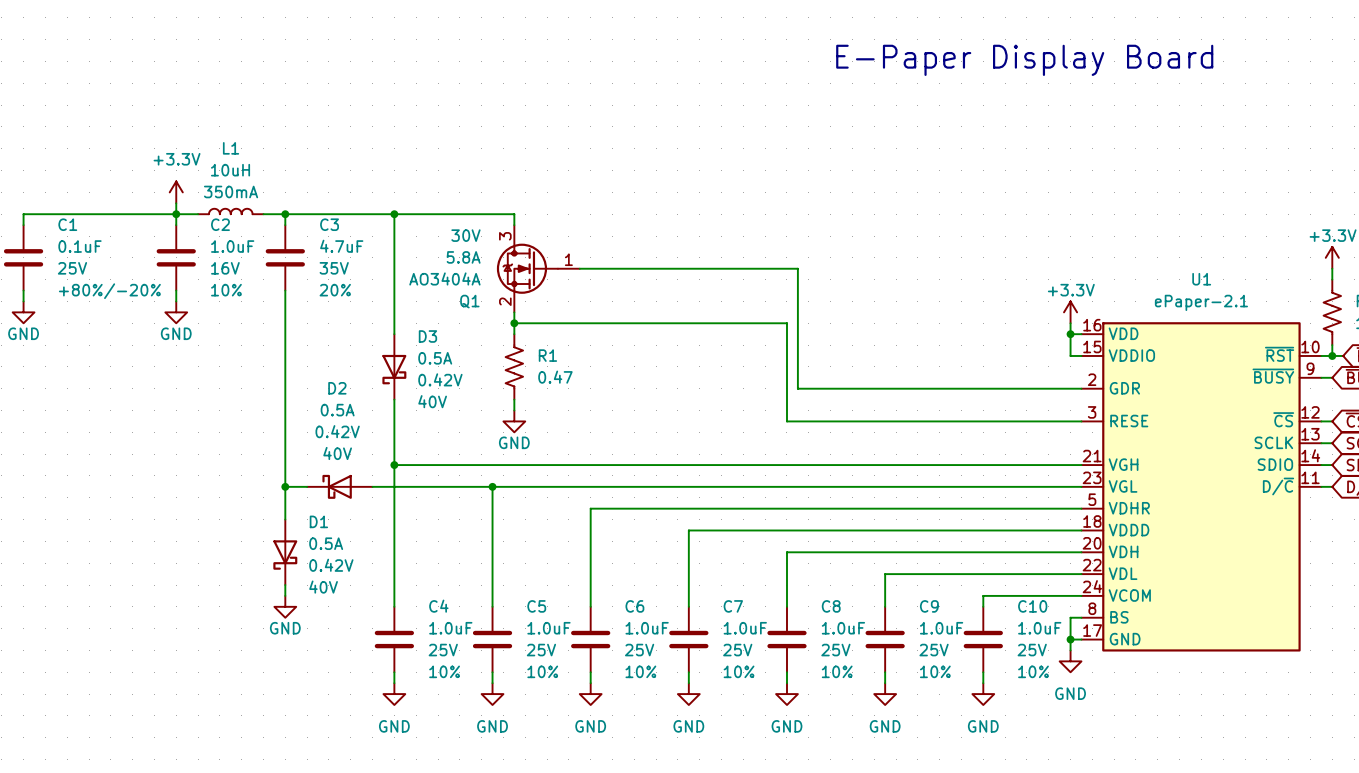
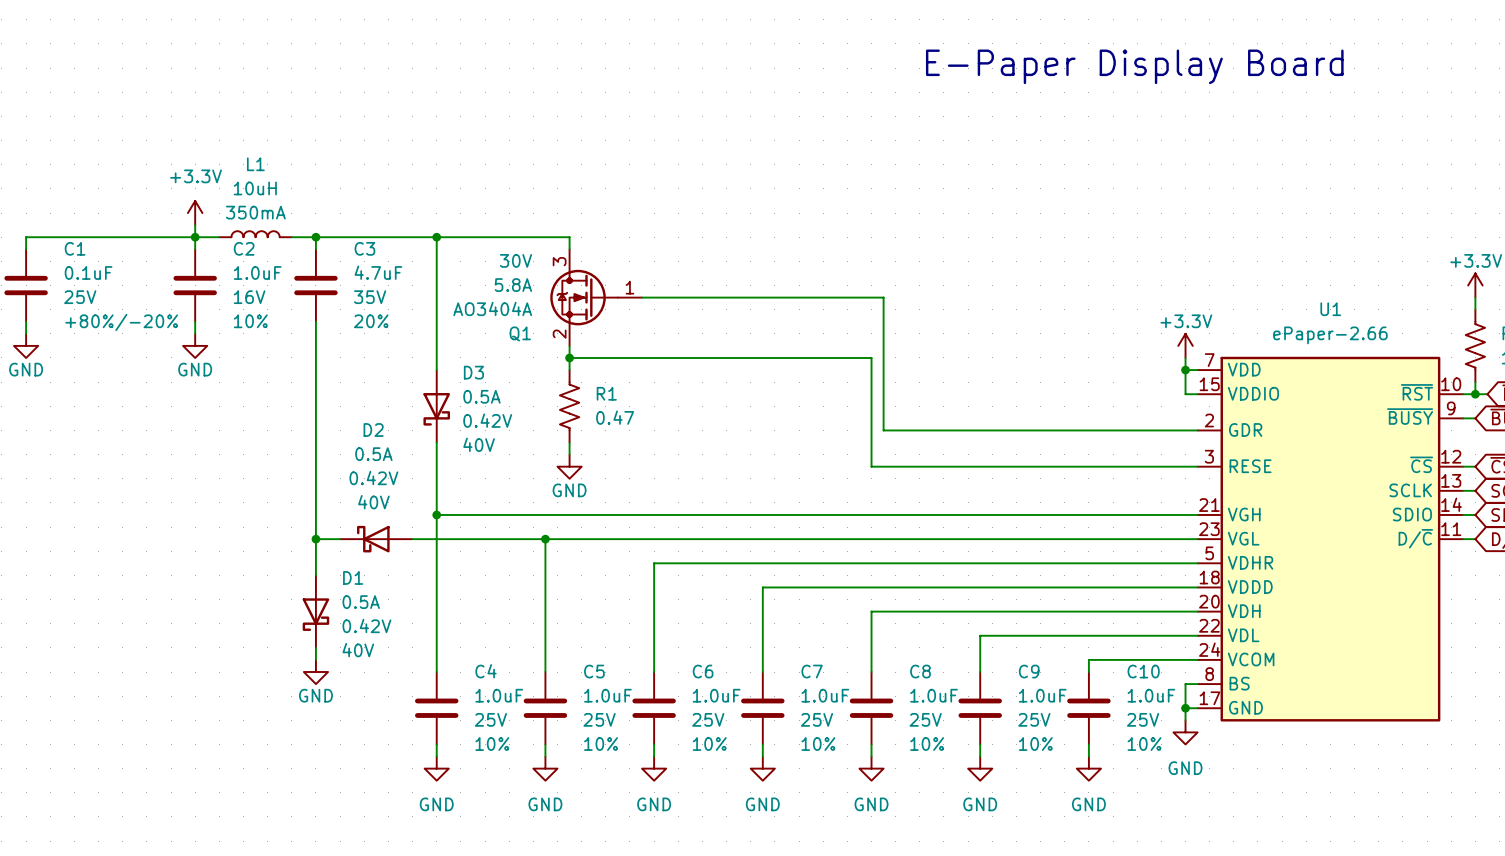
U1 value: ePaper-2.1 (1201, 302) -> ePaper-2.66 (1330, 335)
U1 pin number: 16 (1092, 325) -> 7 (1209, 360)

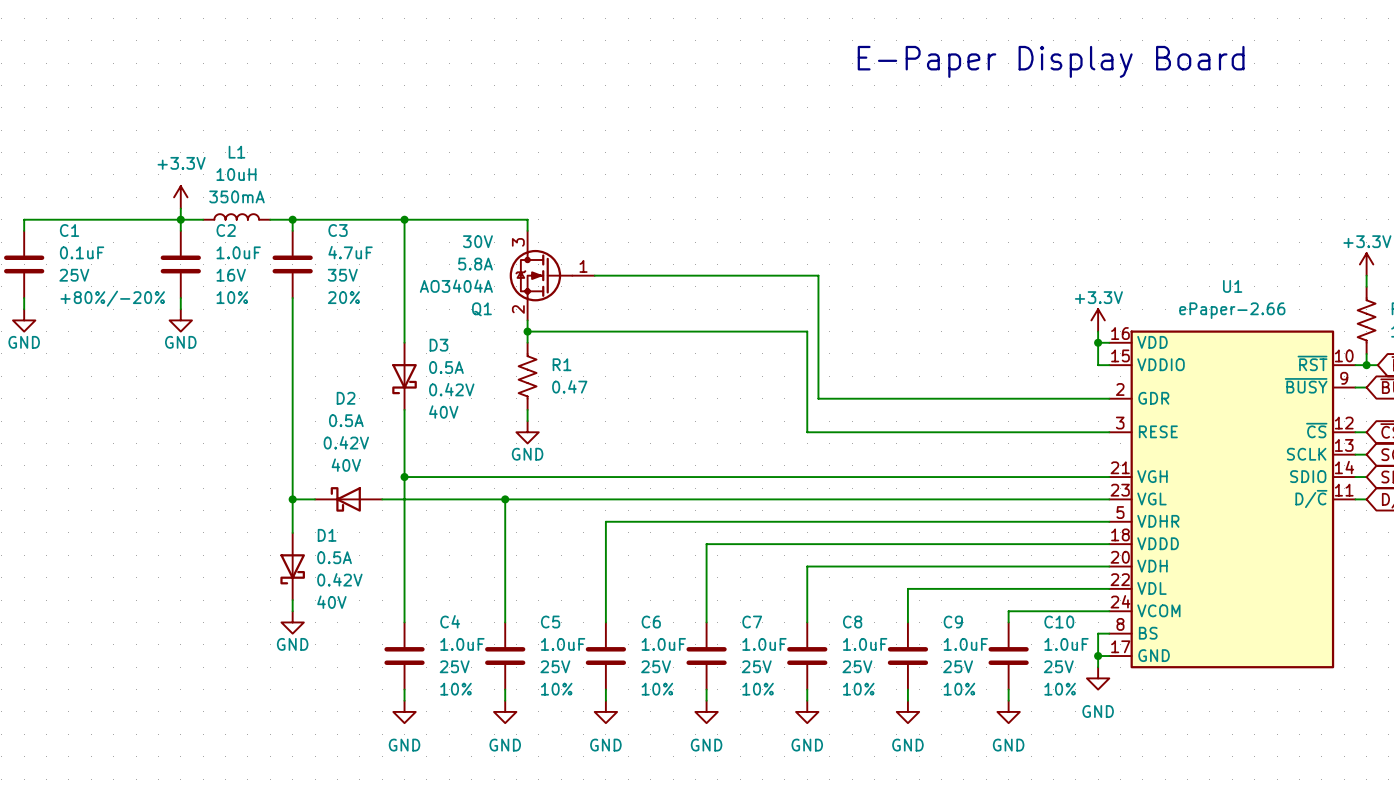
U1 pin number: 7 (1209, 360) -> 16 (1120, 333)

